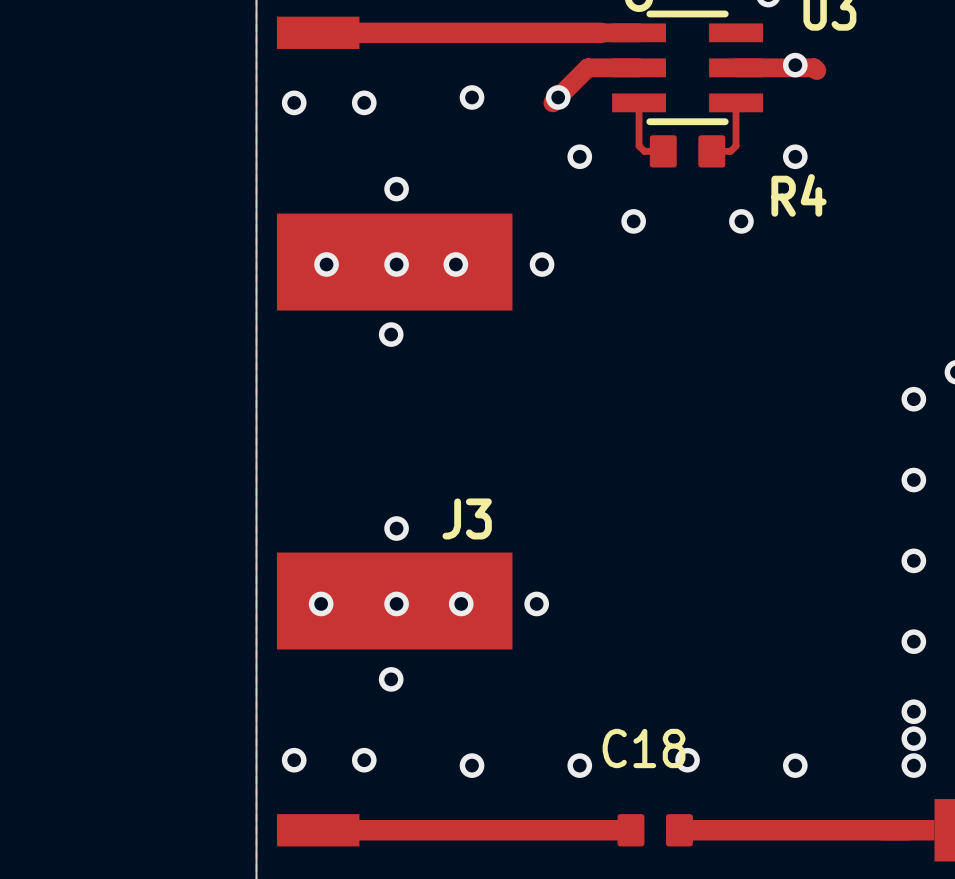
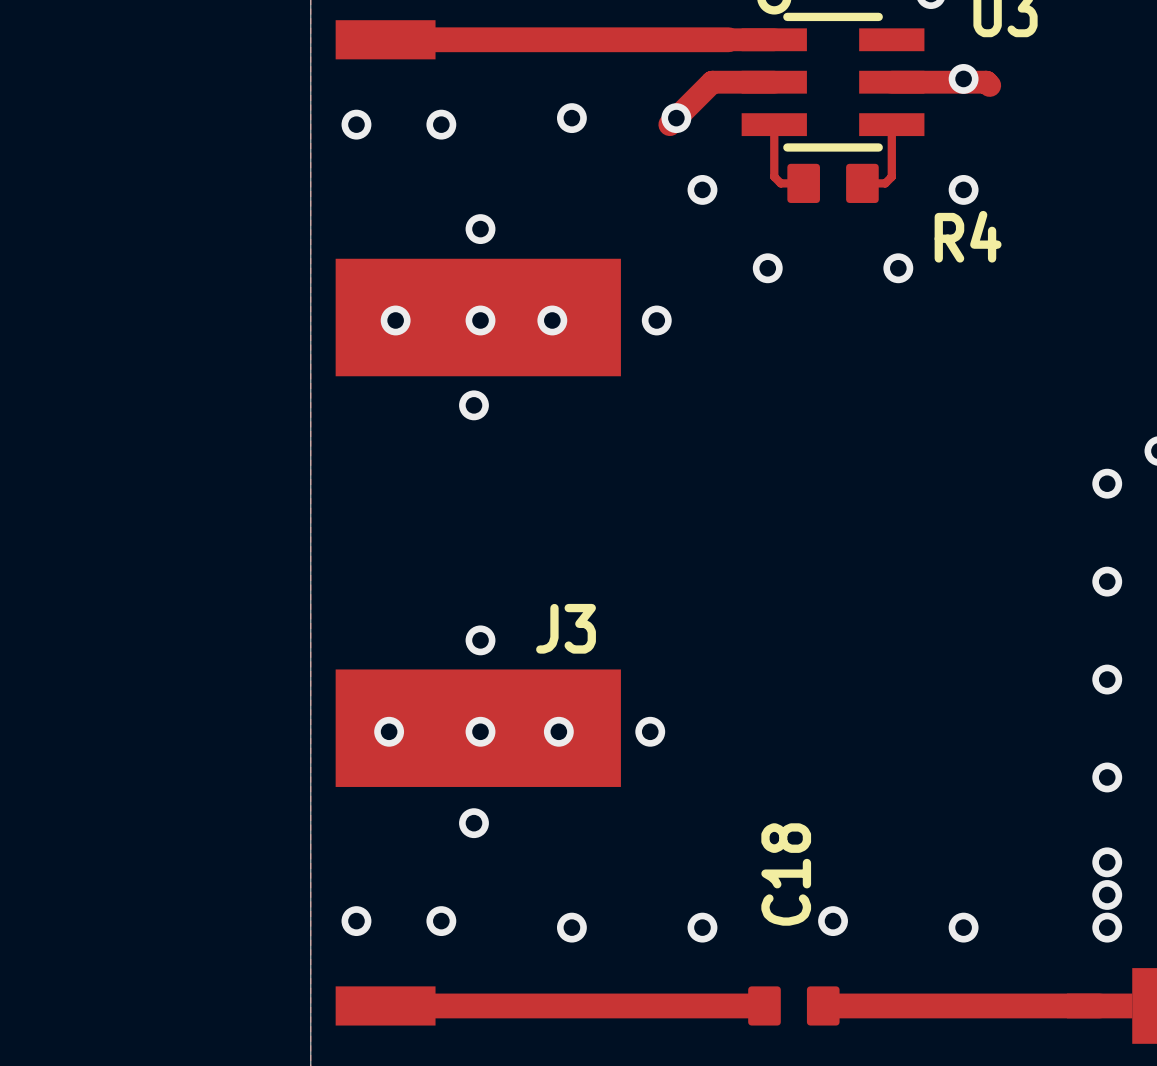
C18 name rotation: 0° (644, 748) -> 90° counterclockwise (786, 874)

